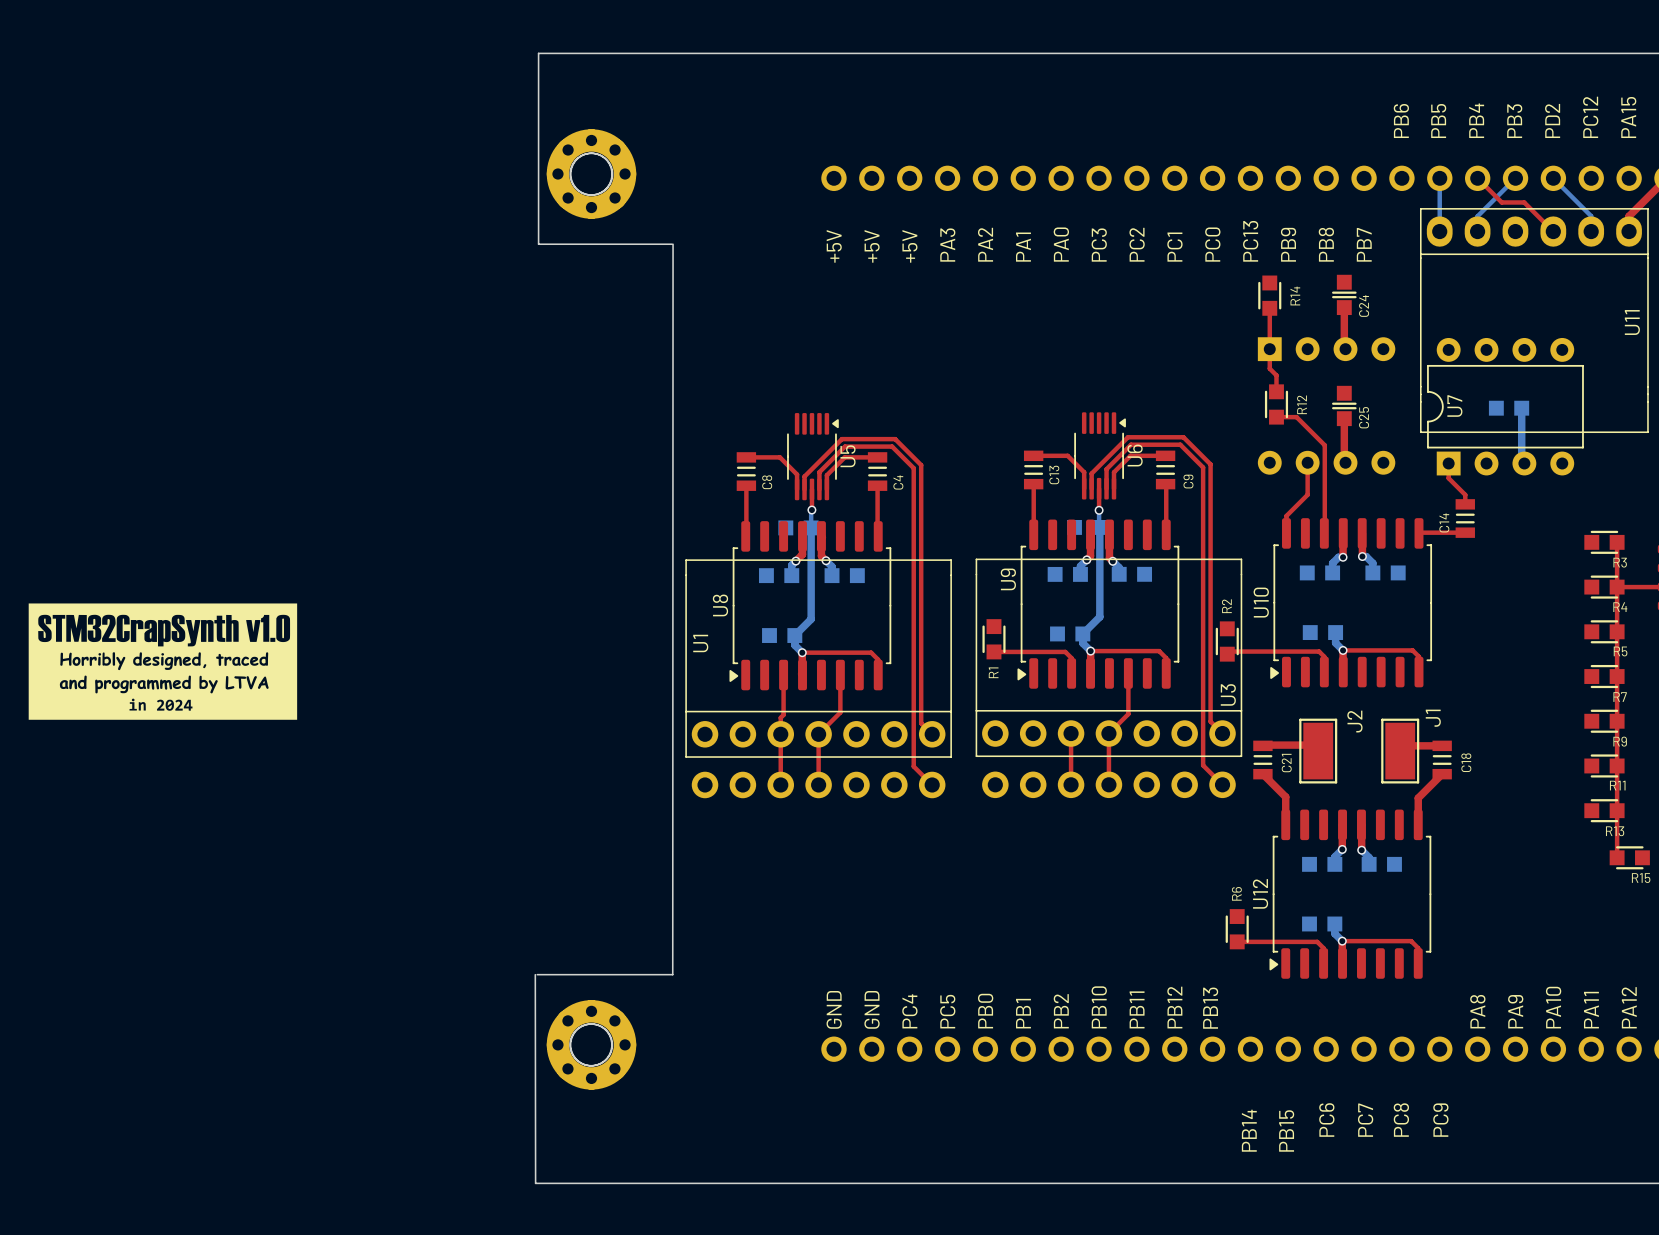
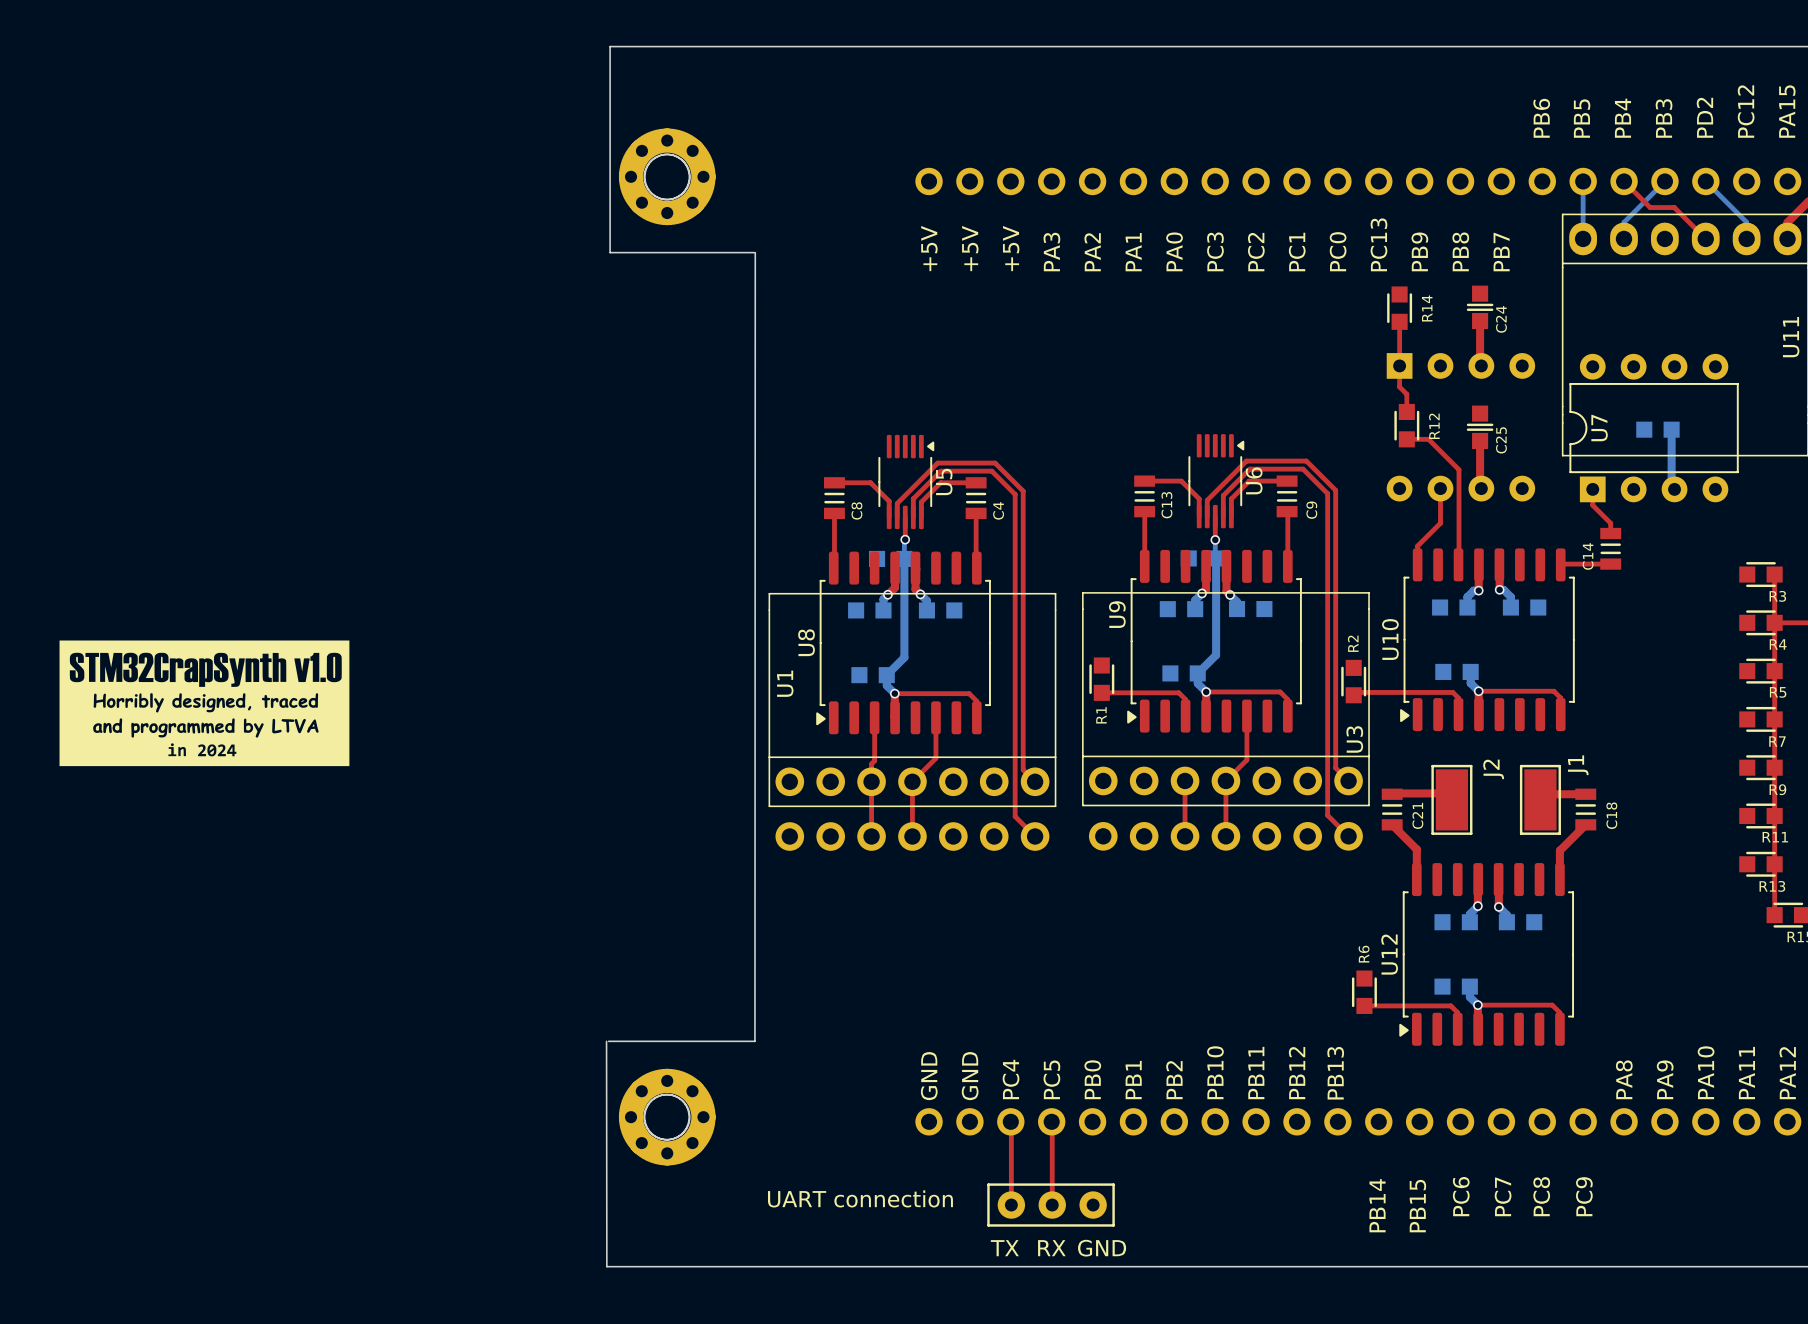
top track: none -> (1010, 1121) (1011, 1205)
top track: none -> (1051, 1121) (1052, 1205)
part: none -> (1051, 1205)

